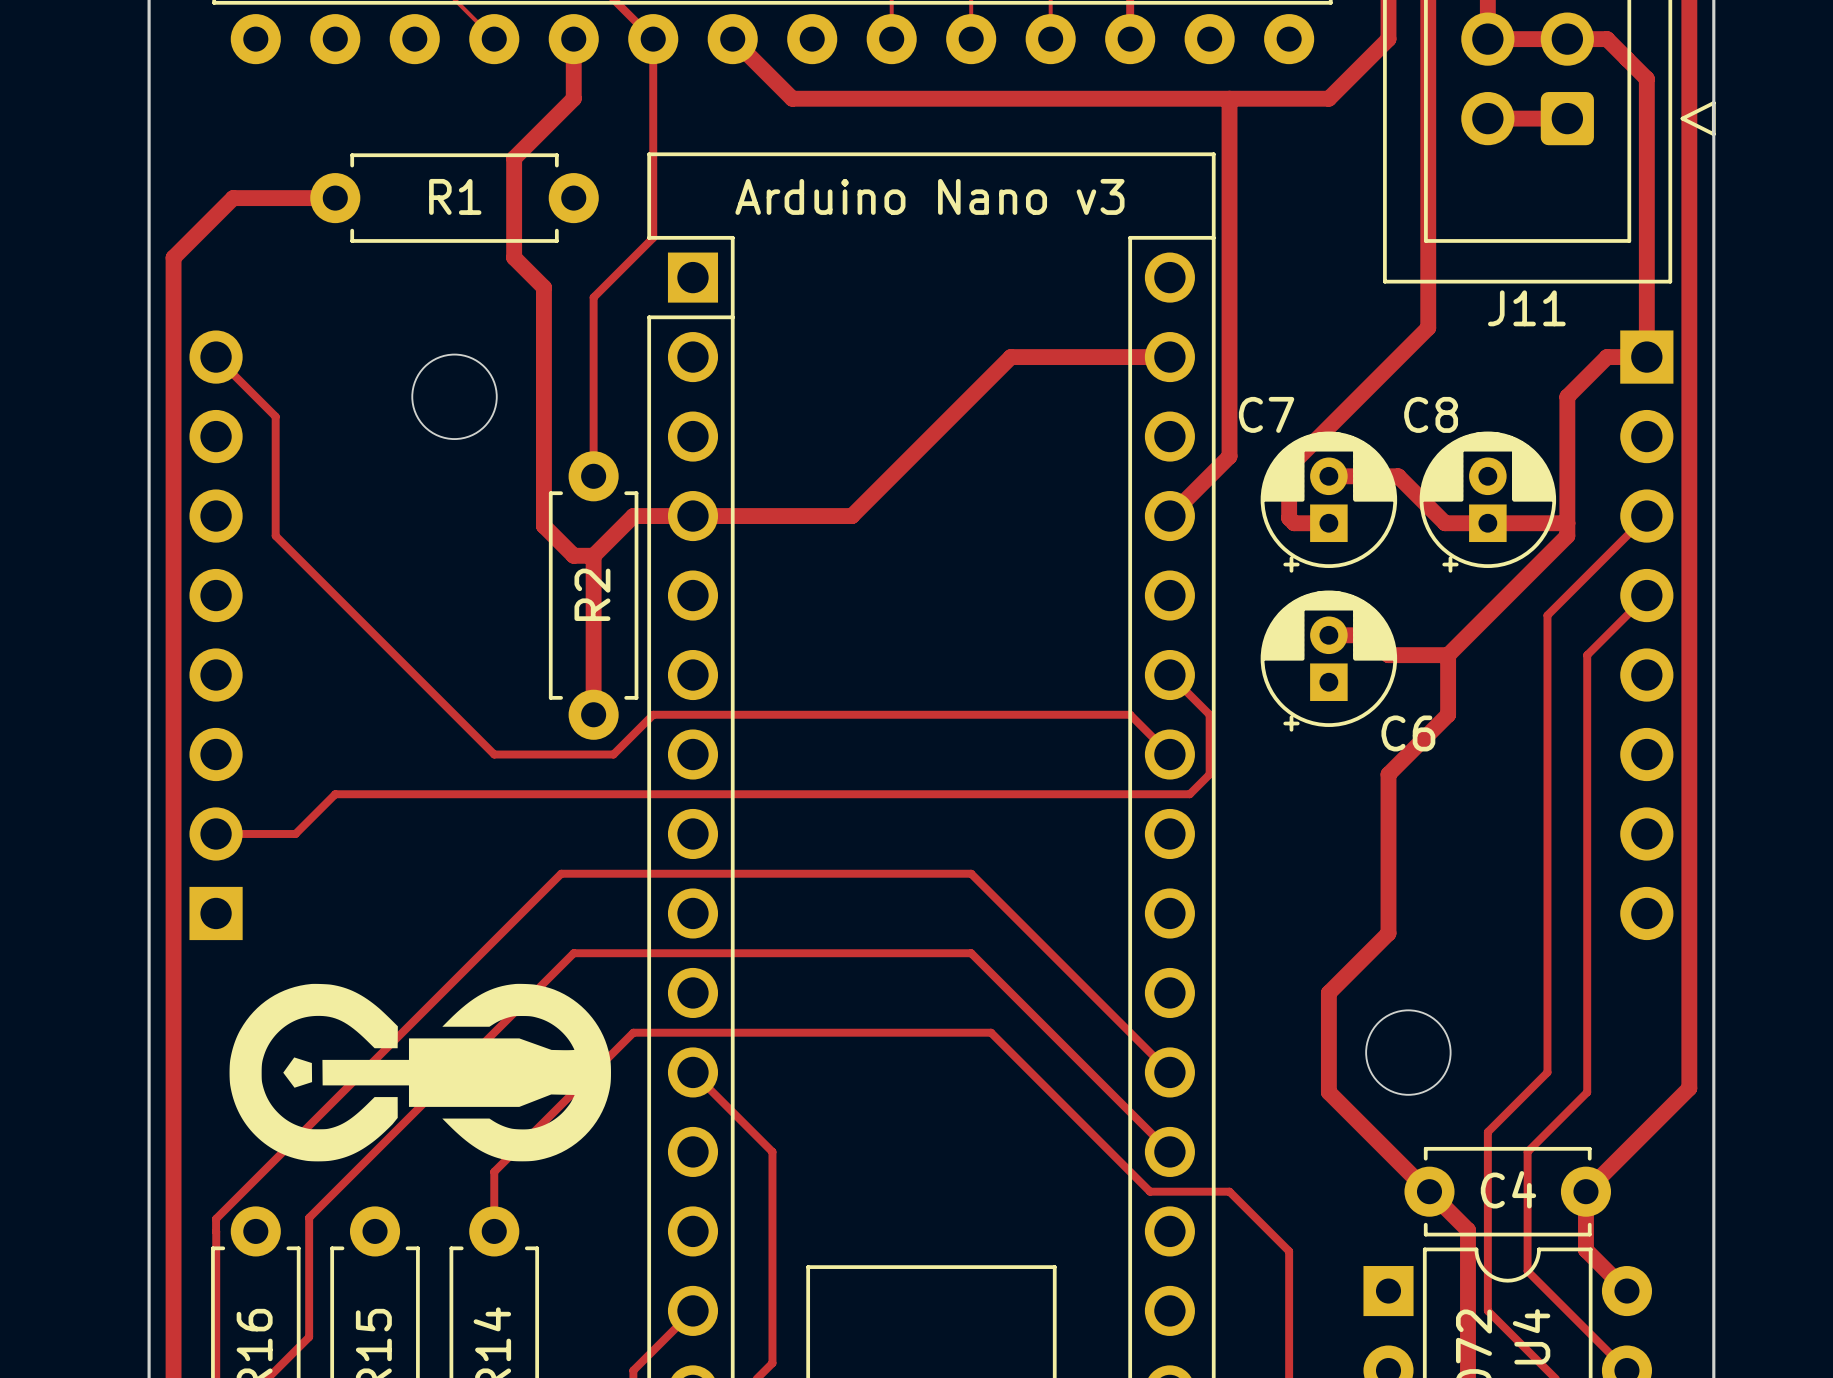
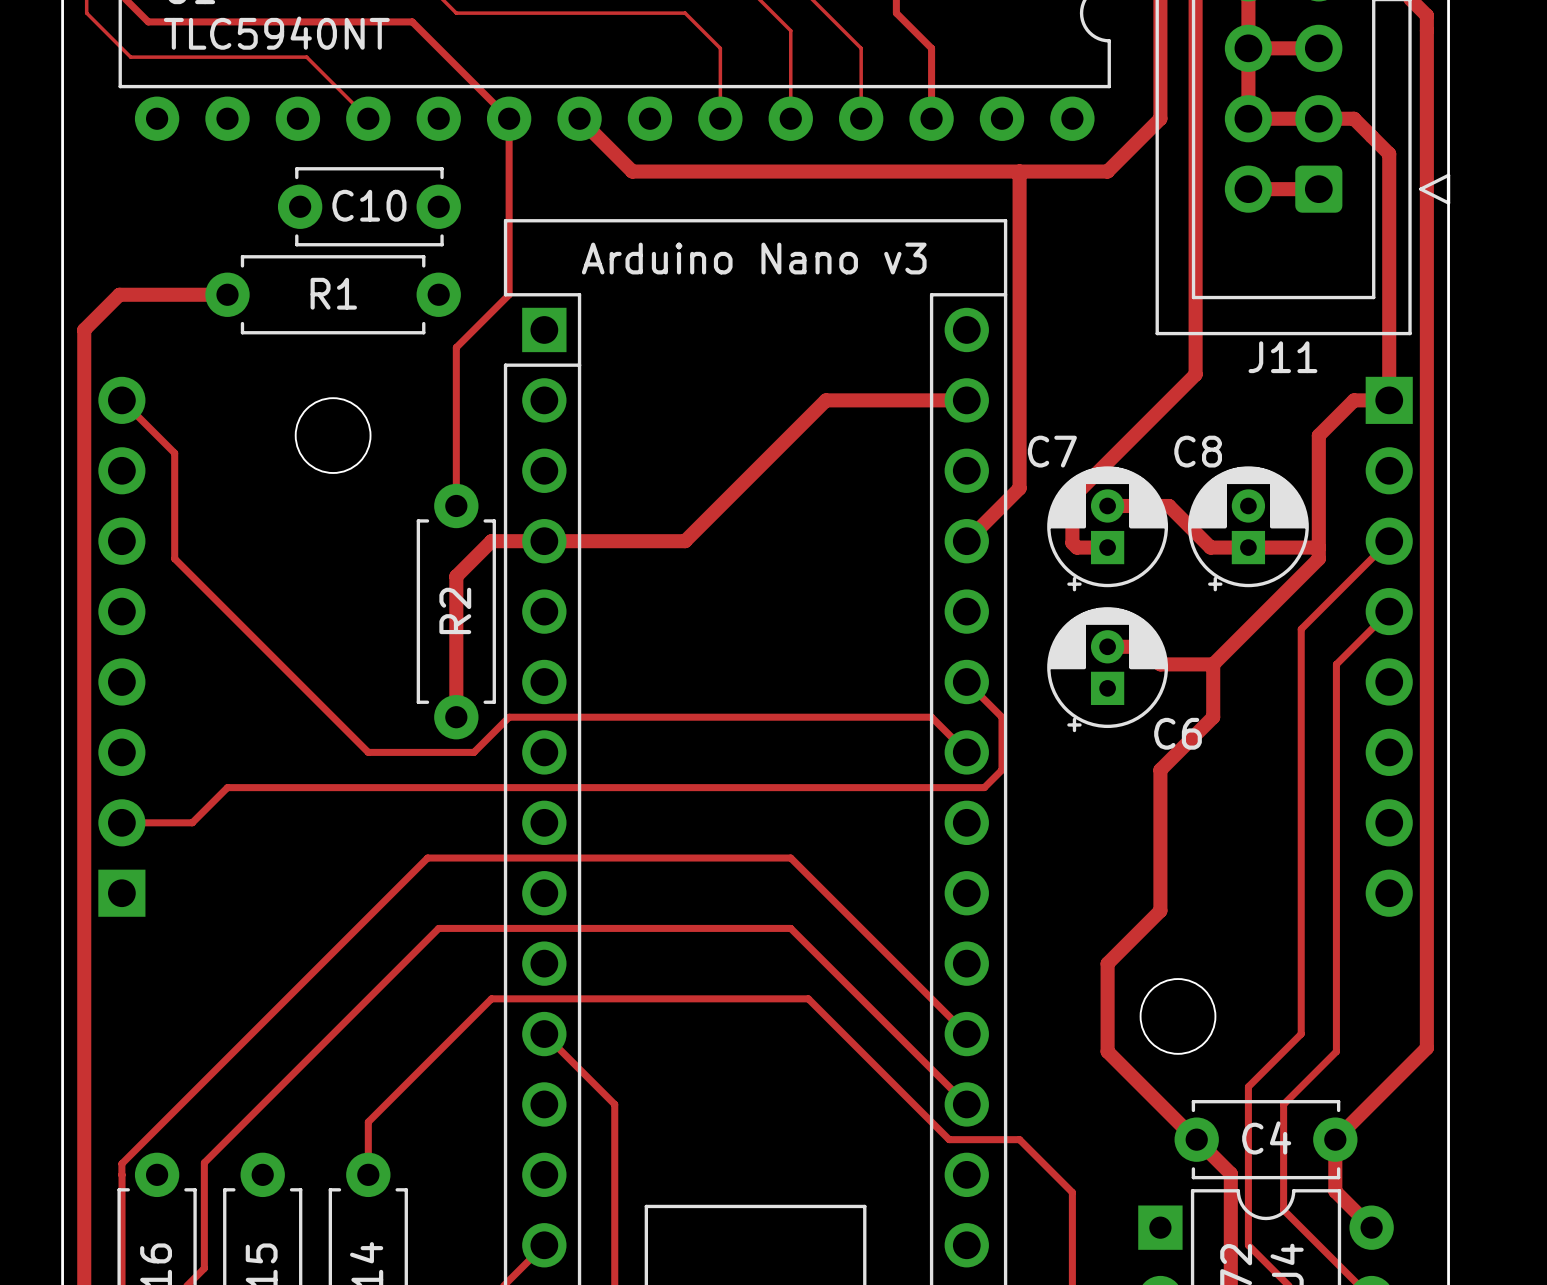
track: (573, 39) (573, 98) (514, 158) (514, 257) (543, 287) (543, 525) (573, 555) (593, 555) -> none
C10: none -> (369, 206)
track: (335, 198) (233, 198) (173, 257) (173, 277) -> (227, 294) (119, 294) (84, 329)
R1 position: (454, 198) -> (333, 294)
drawing: [229, 983, 611, 1162] -> none

